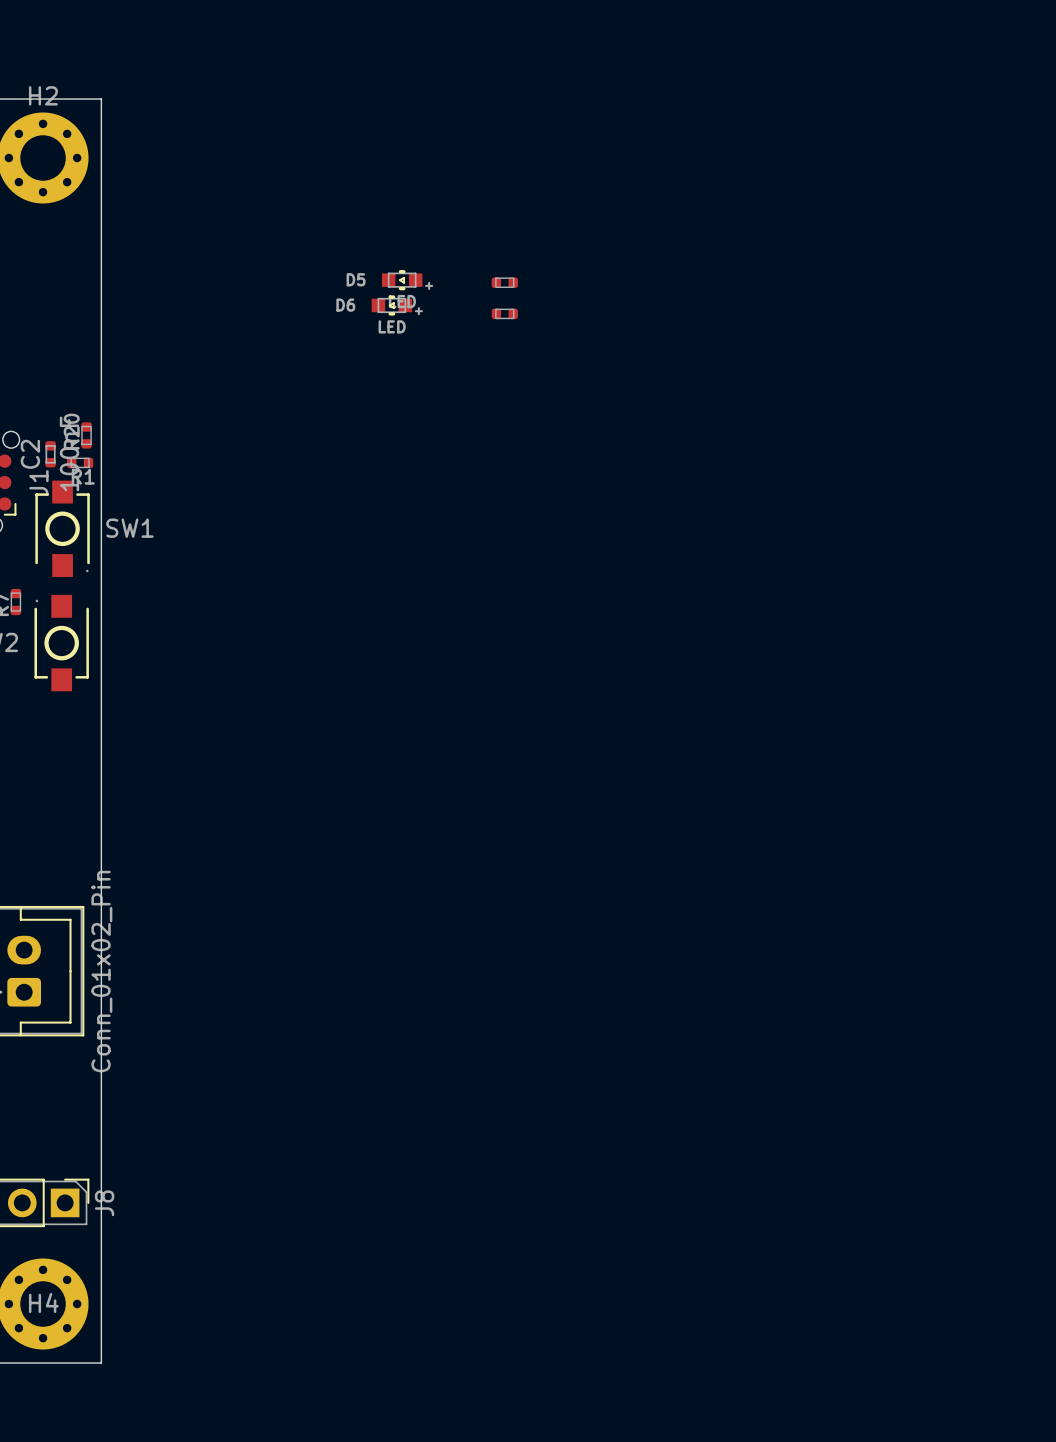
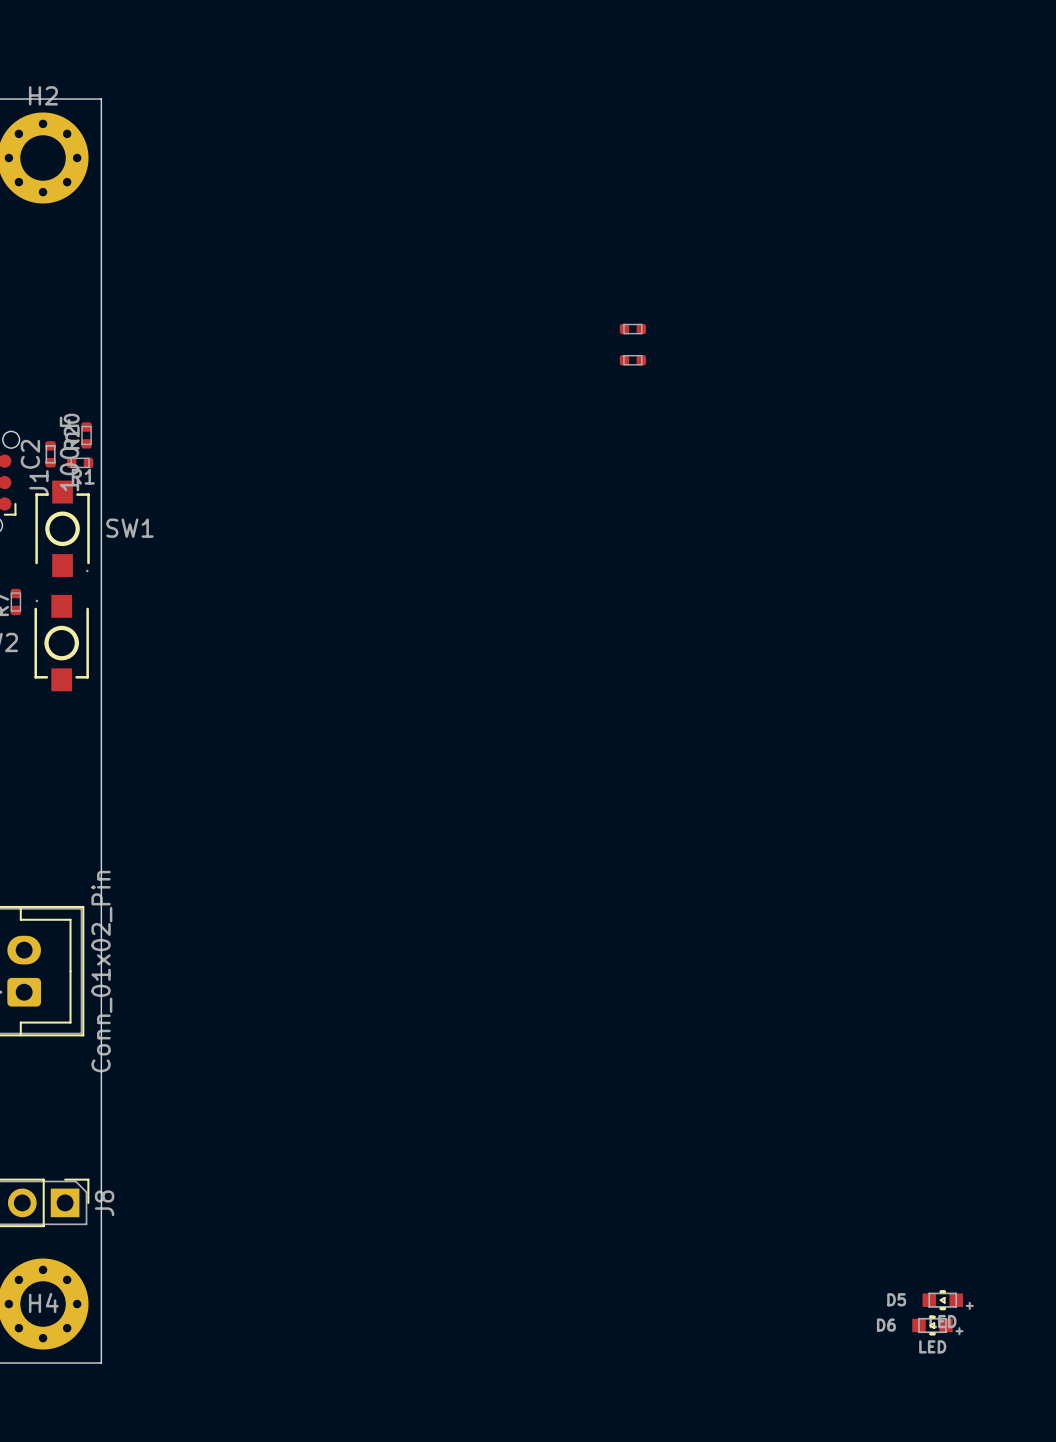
D5 position: (402, 280) -> (942, 1300)
part: (504, 282) -> none
D6 position: (391, 305) -> (932, 1325)
part: (504, 313) -> none
part: none -> (632, 329)
part: none -> (632, 360)

